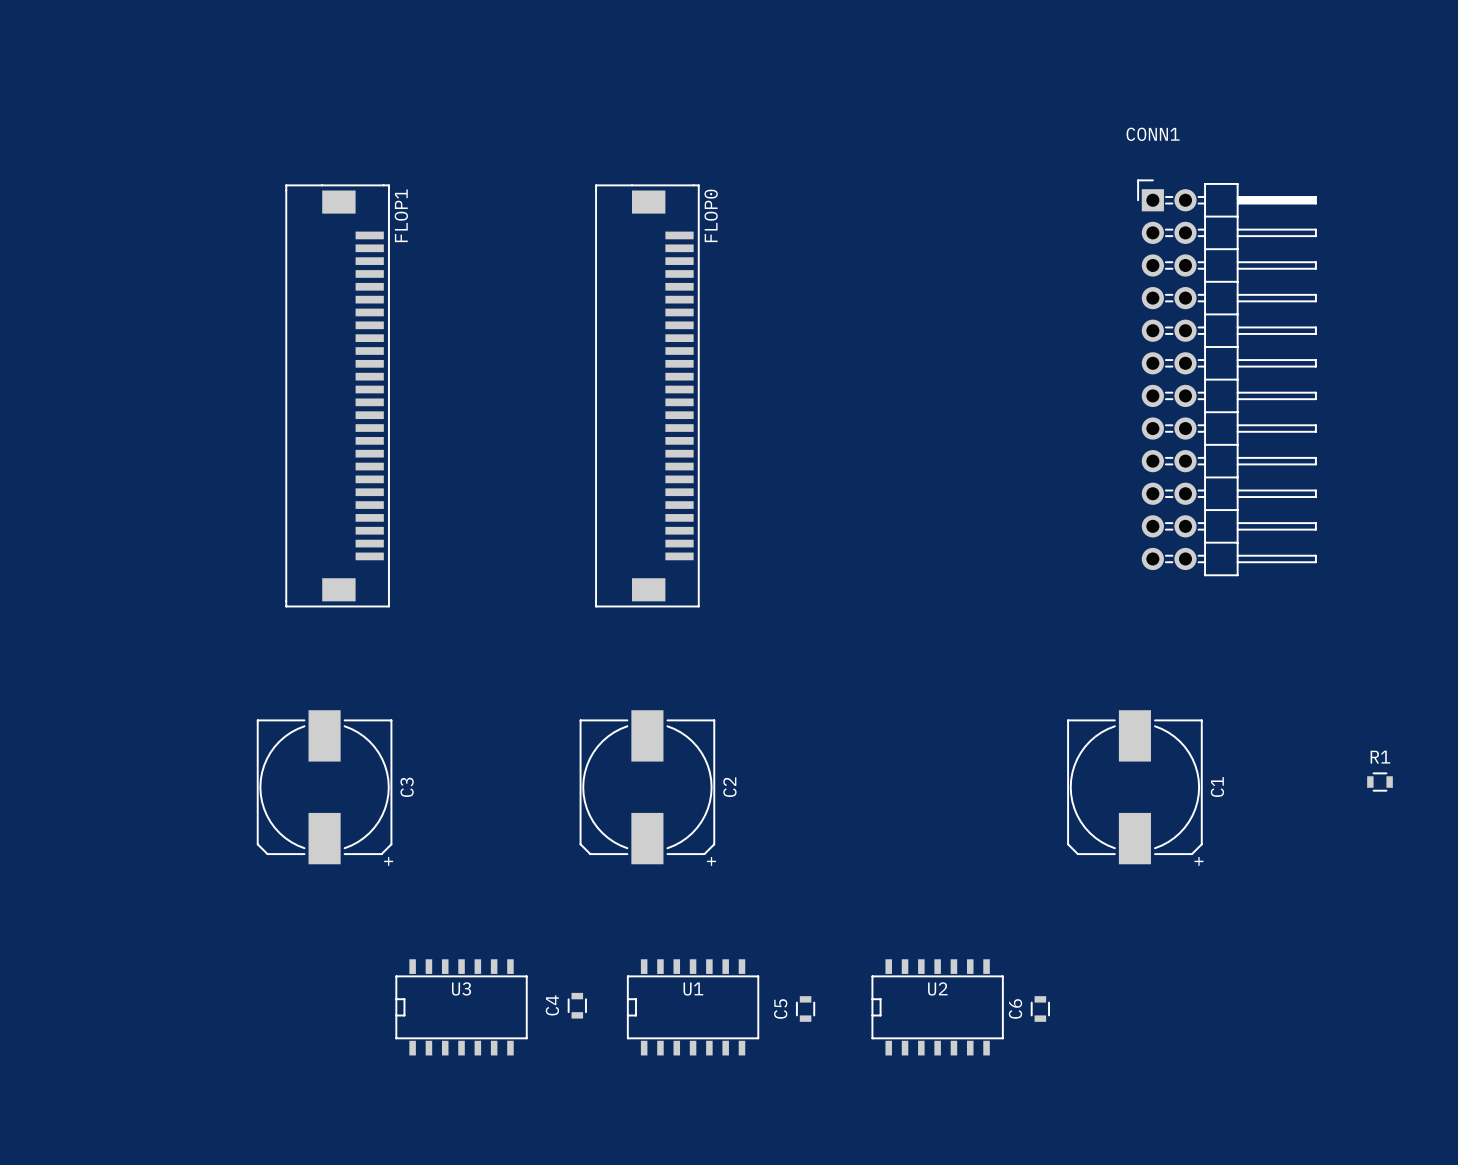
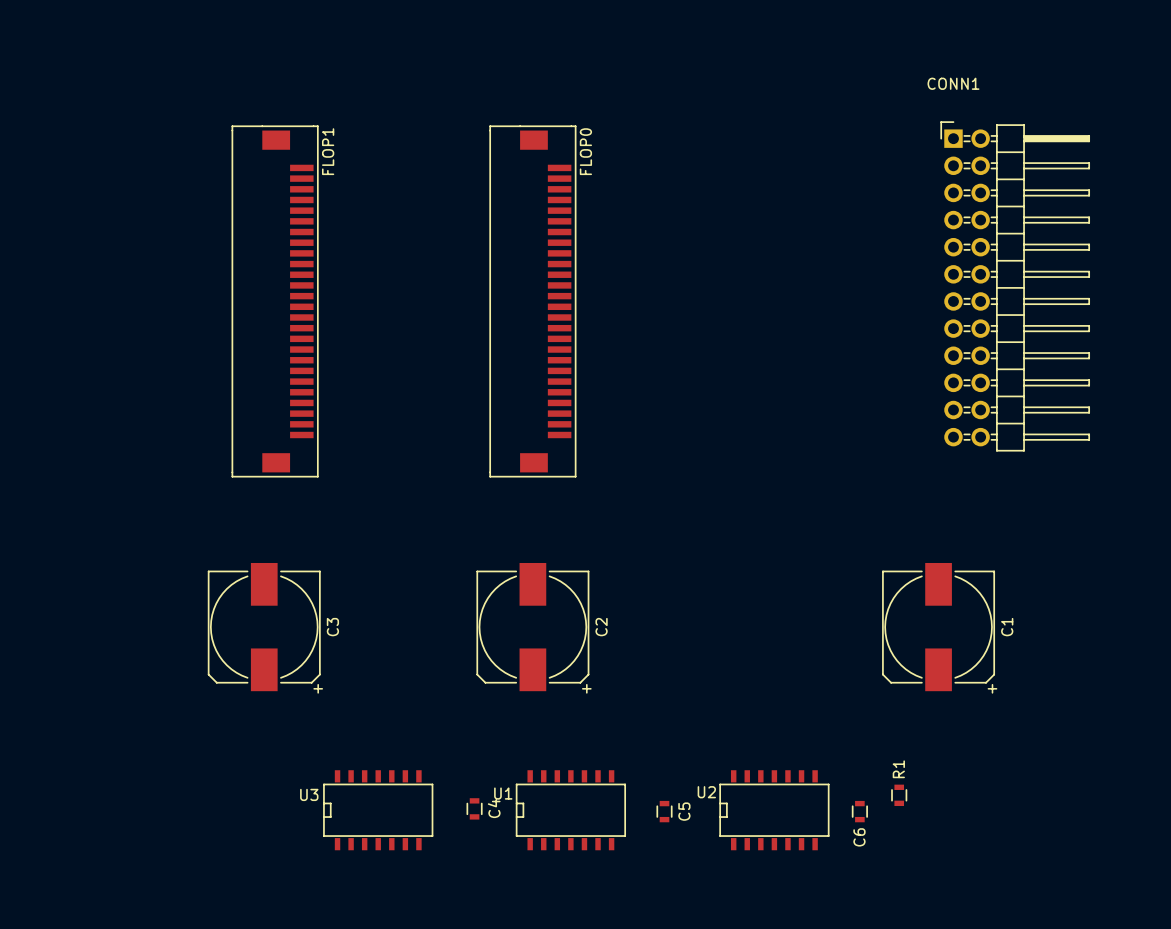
R1 rotation: 0° (1379, 782) -> 90° clockwise (899, 795)
R1 position: (1379, 782) -> (899, 795)
U3 name position: U3 (461, 988) -> U3 (309, 794)
U2 name position: U2 (937, 988) -> U2 (706, 792)
U1 name position: U1 (693, 989) -> U1 (503, 793)
C4 name position: C4 (552, 1005) -> C4 (494, 808)
C5 name position: C5 (780, 1008) -> C5 (684, 811)
C6 name position: C6 (1015, 1008) -> C6 (859, 837)

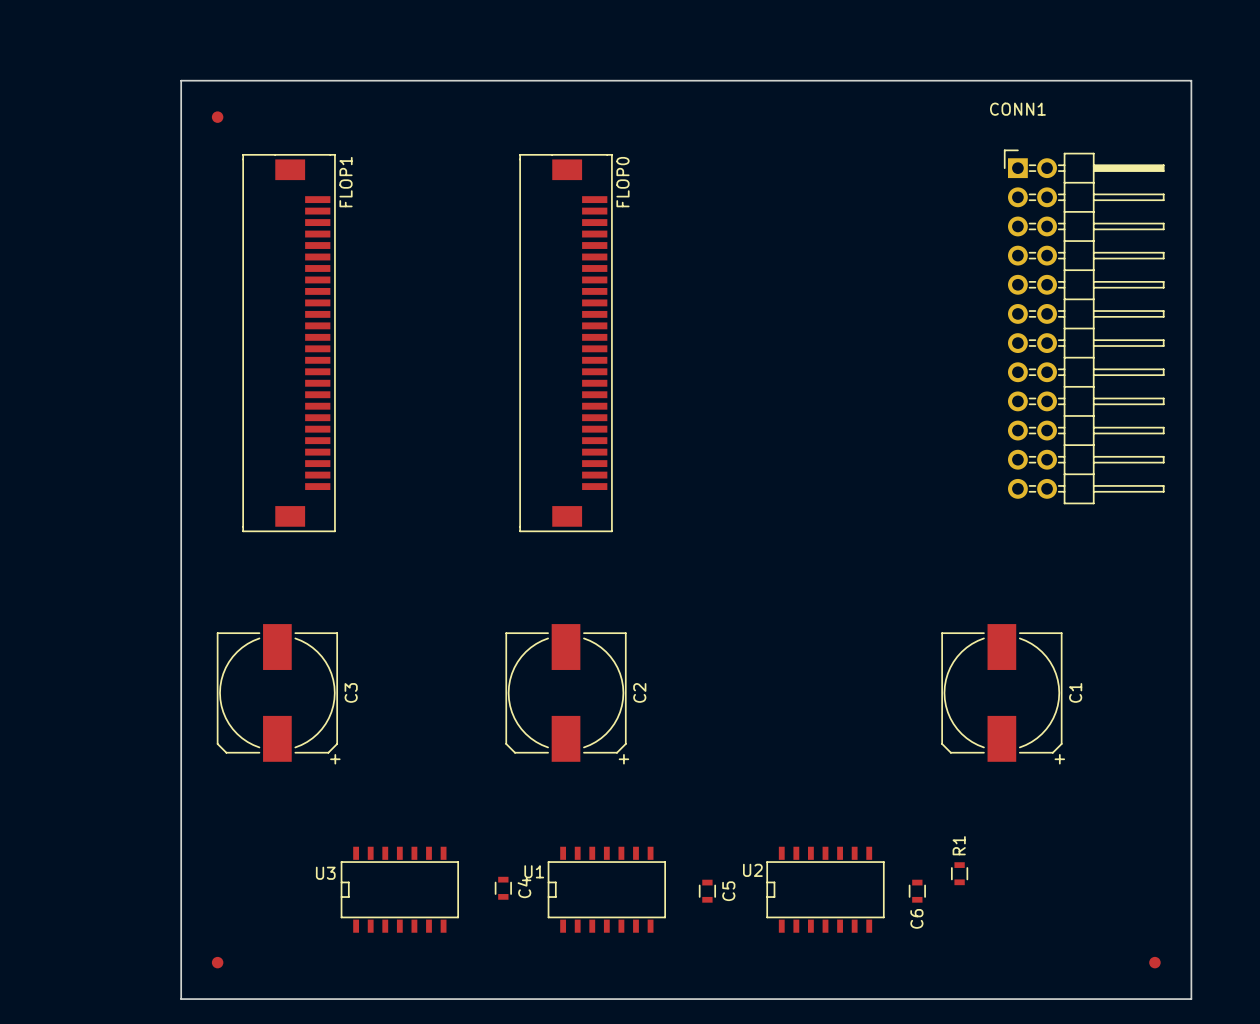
board edge: none -> (181, 80) (181, 999) (1191, 999) (1191, 80) (181, 80)
part: none -> (217, 117)
part: none -> (217, 962)
part: none -> (1154, 962)

